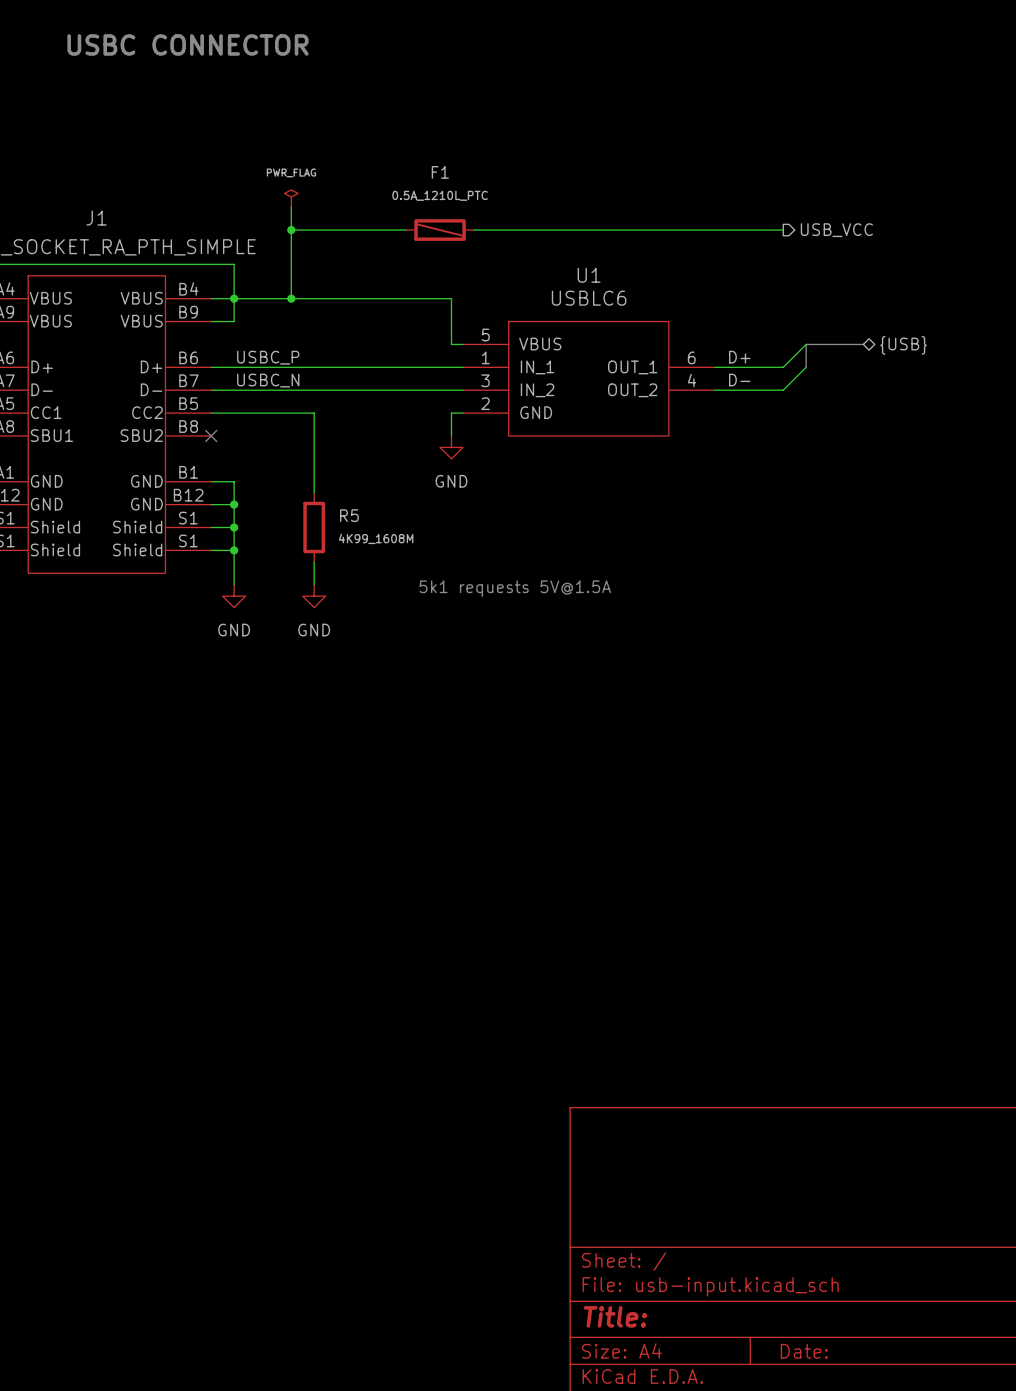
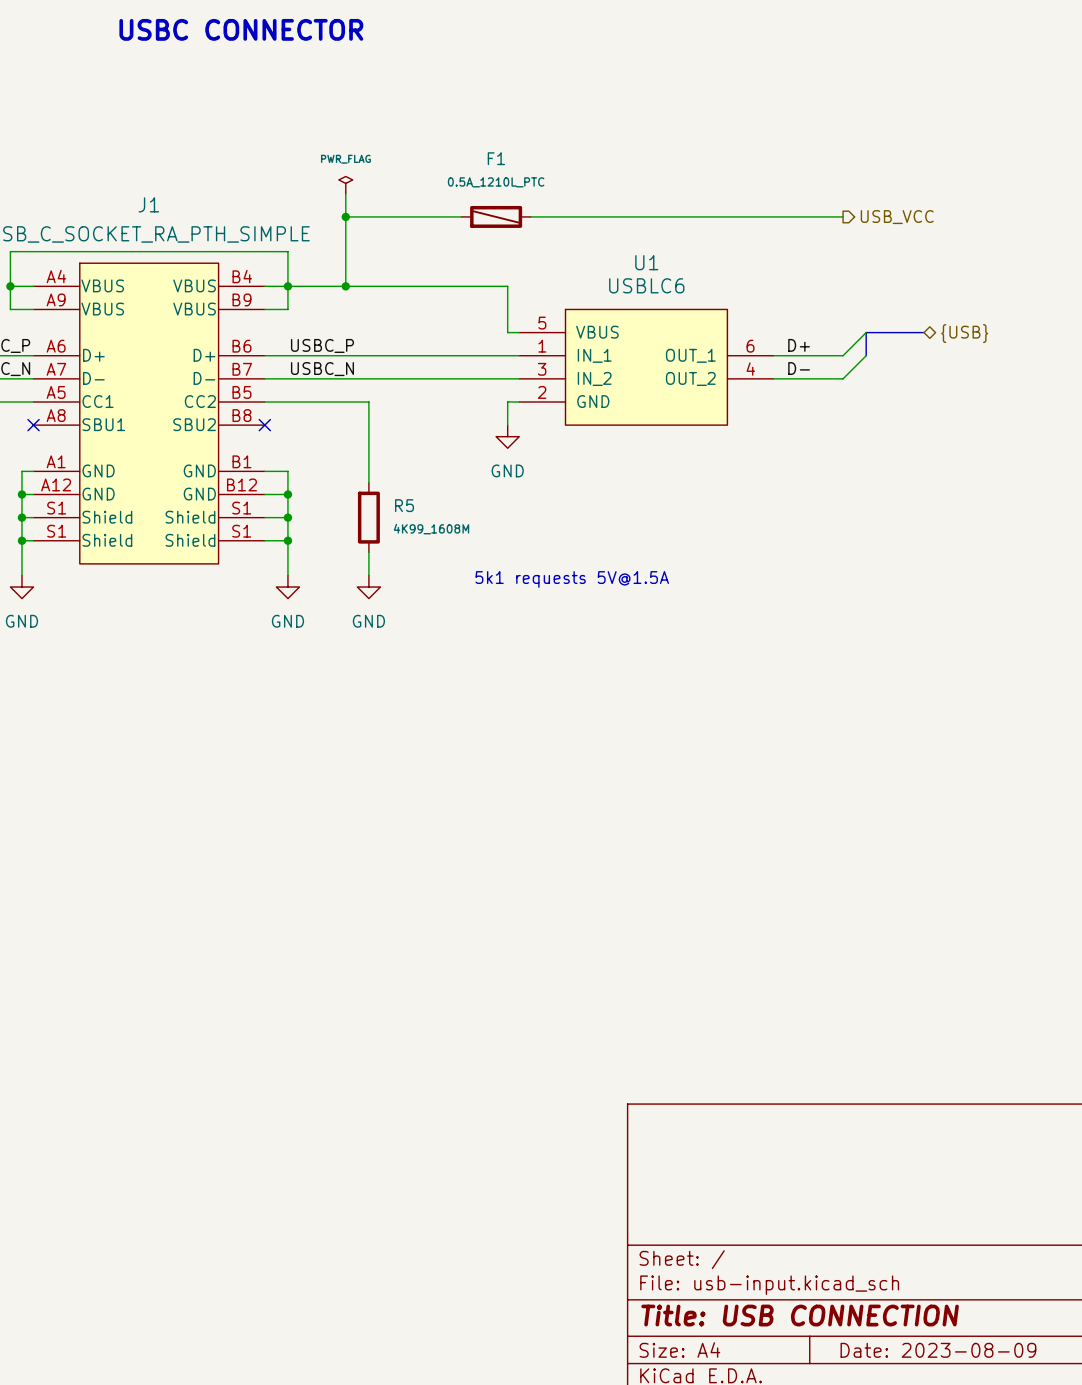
title block: Title: (615, 1316) -> Title: USB CONNECTION (800, 1315)
title block: Date: (804, 1351) -> Date: 2023-08-09 (938, 1350)

